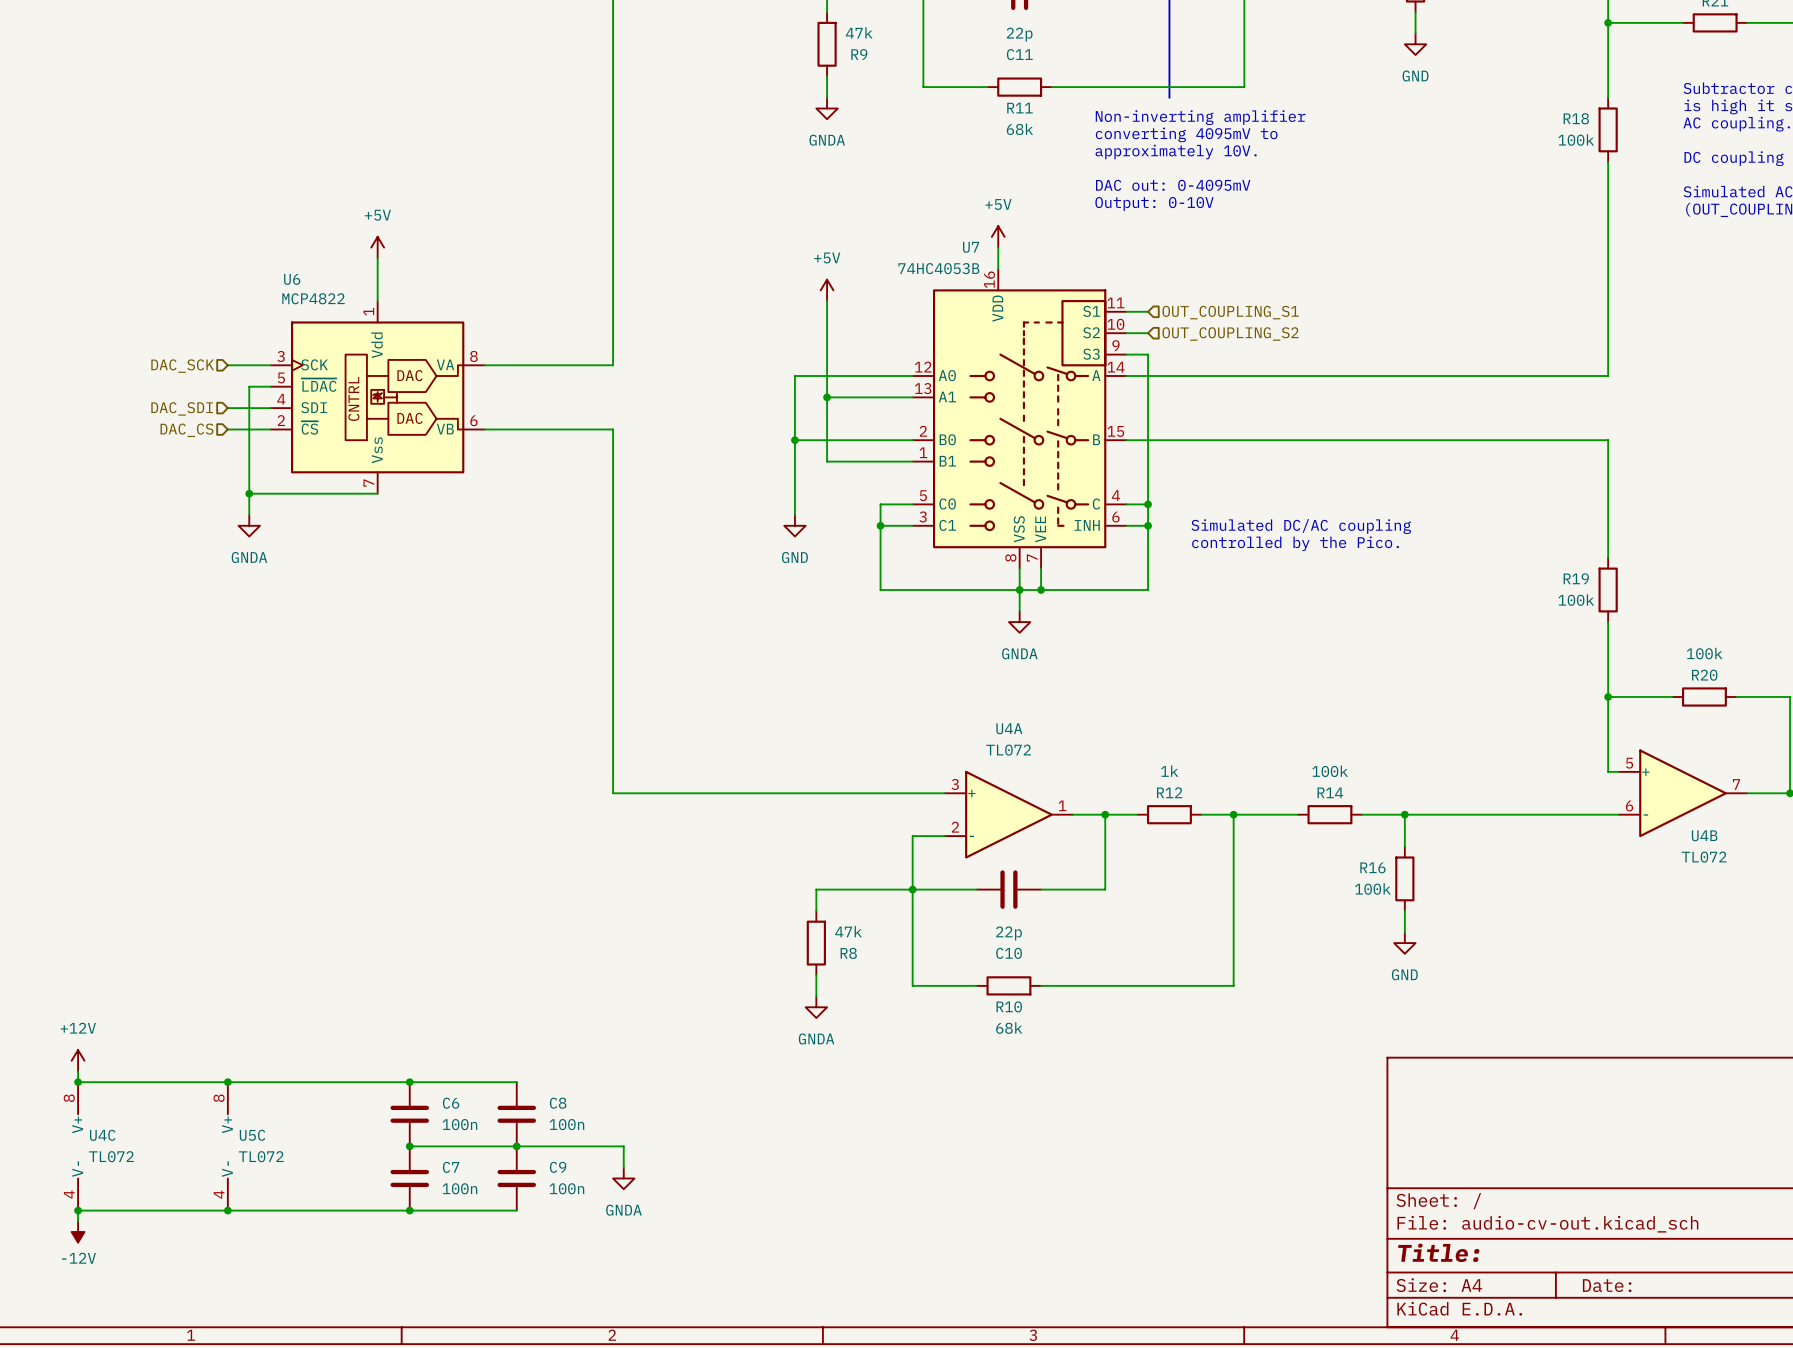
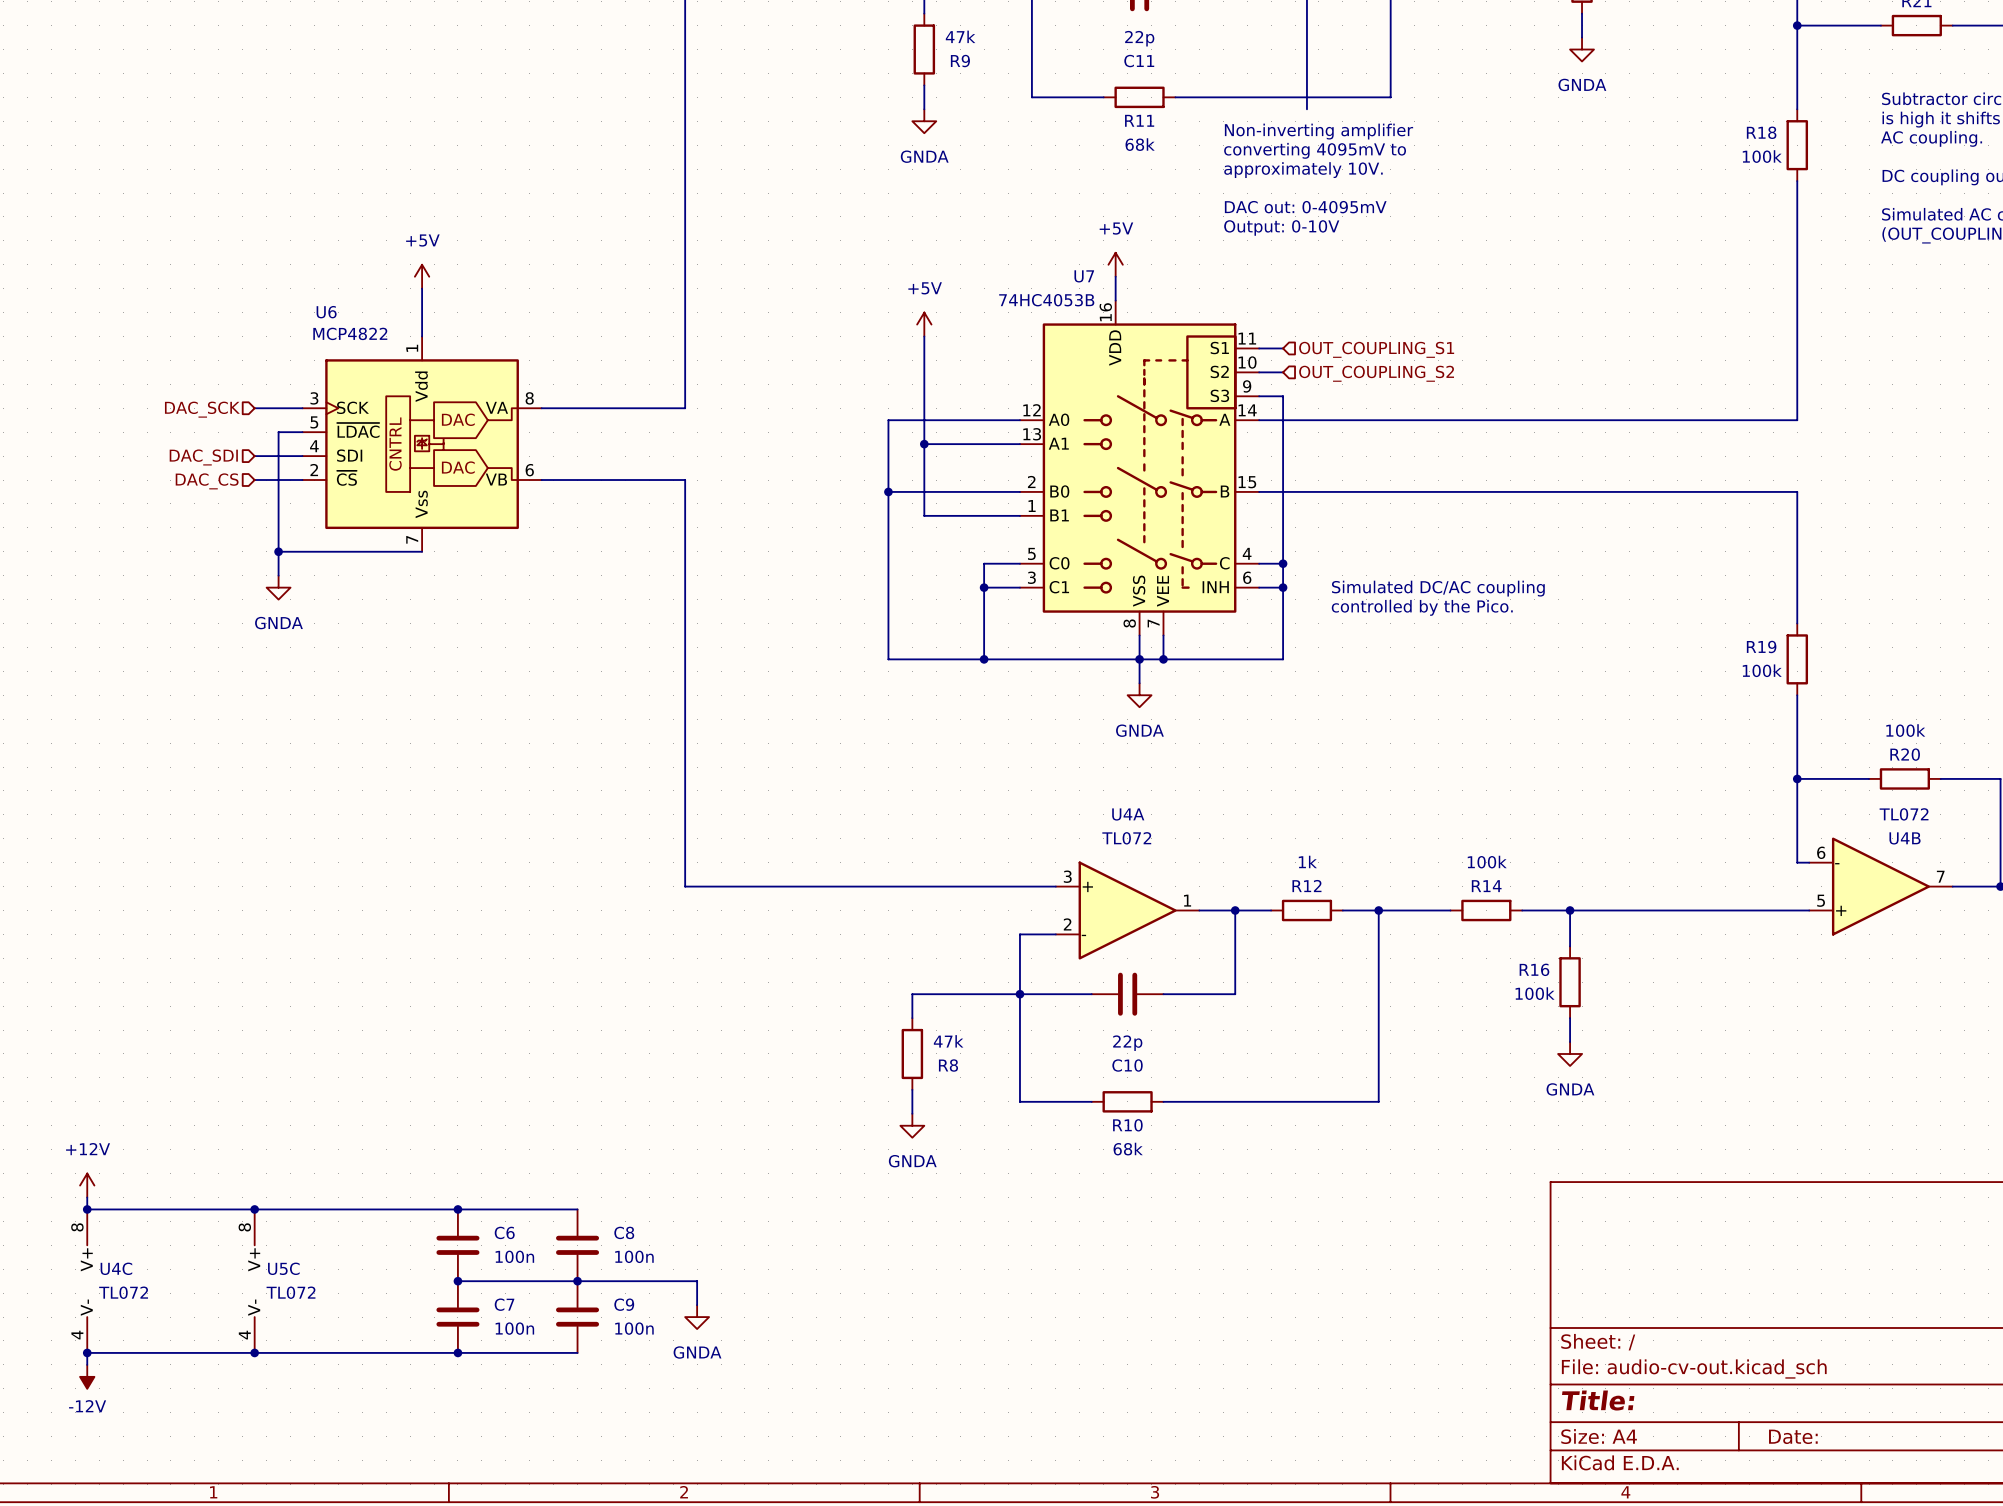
power symbol: GND (1415, 44) -> GNDA (1582, 49)
wire: none -> (888, 575) (888, 659) (984, 659)
power symbol: GND (794, 525) -> none
junction: none -> (984, 659)
U4B flip: as is (1683, 793) -> up-down (1880, 886)
power symbol: GND (1404, 943) -> GNDA (1570, 1053)

